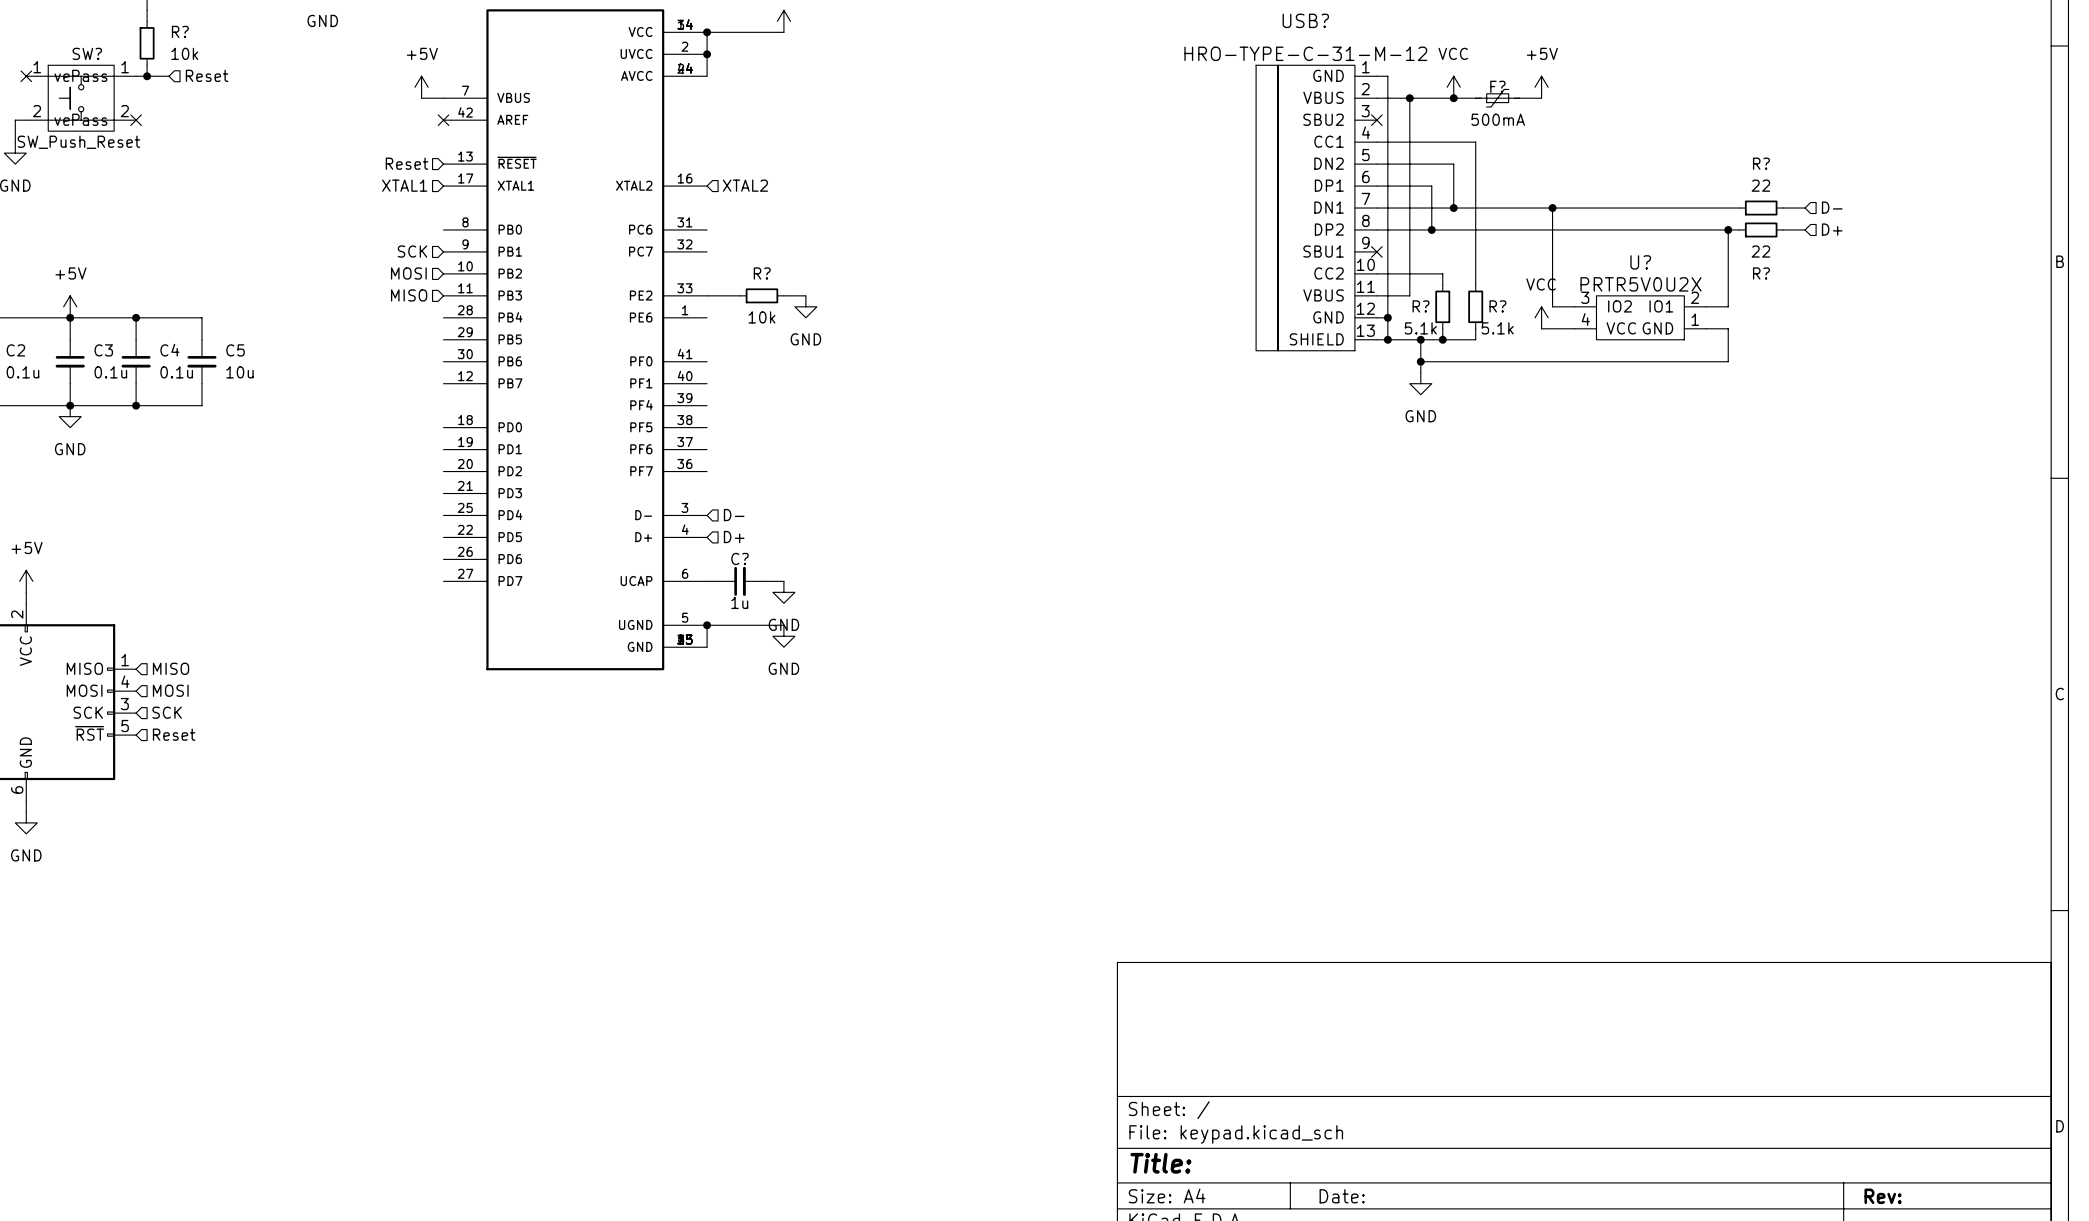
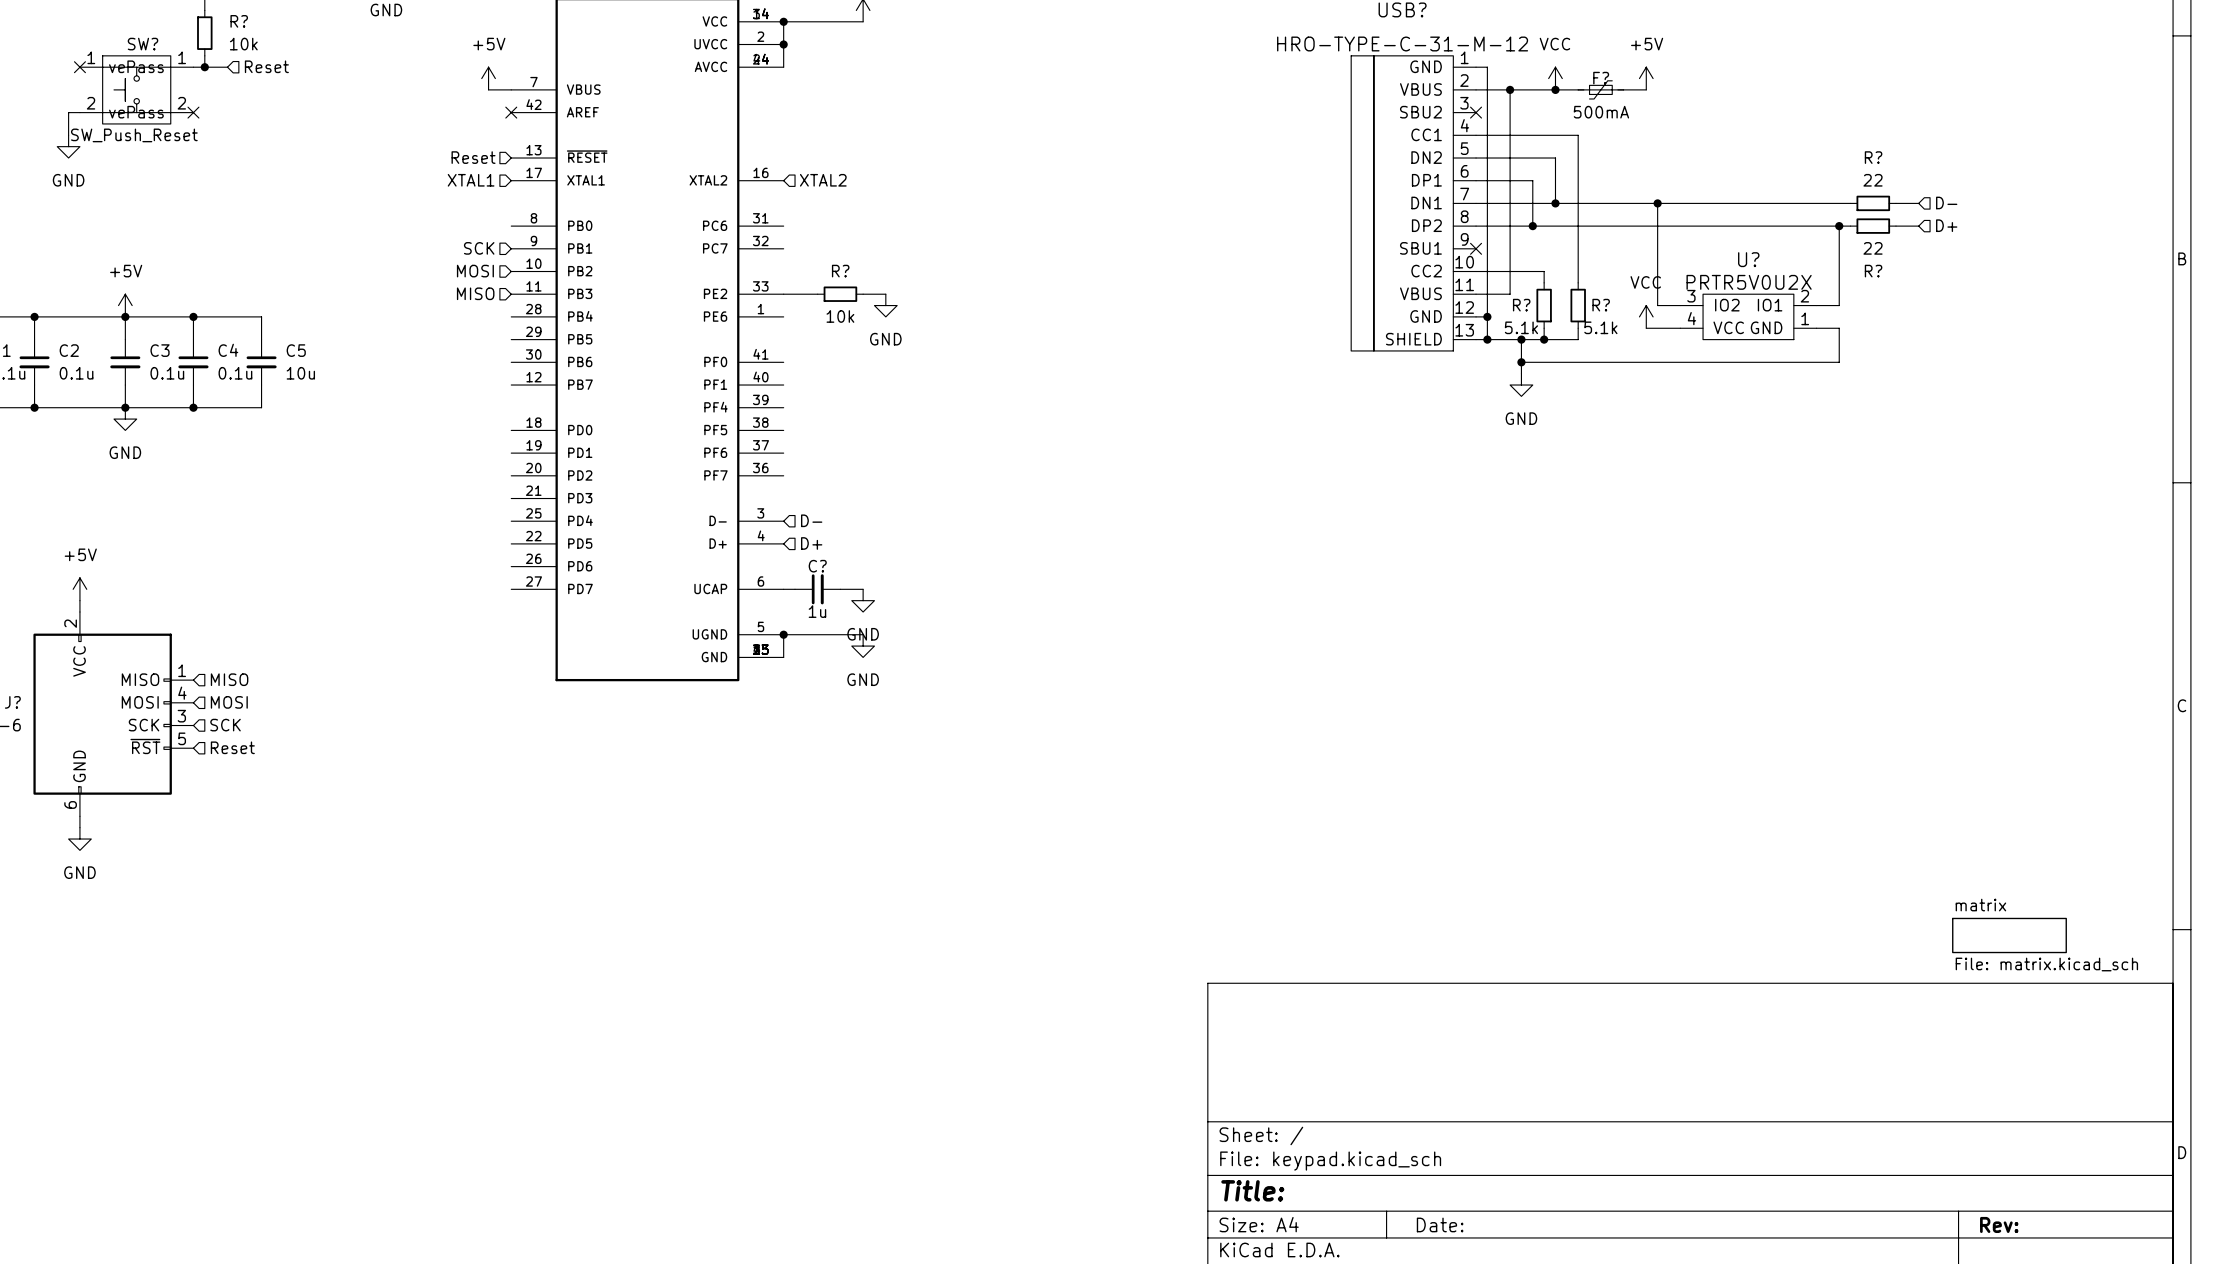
sheet matrix: none -> File: matrix.kicad_sch (2009, 935)

